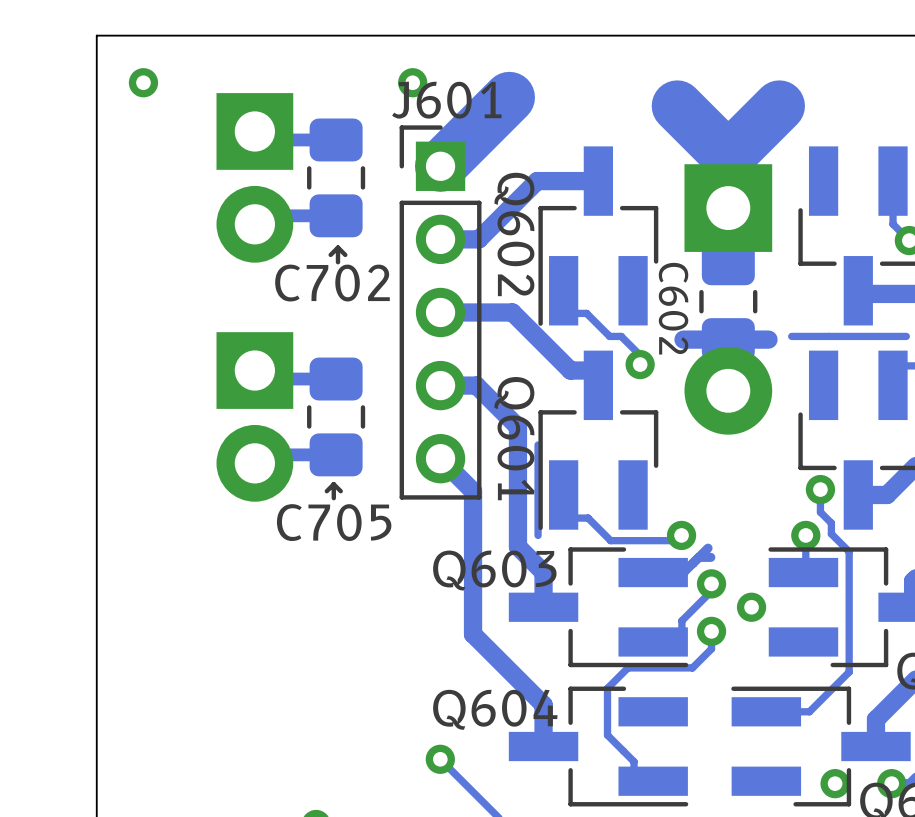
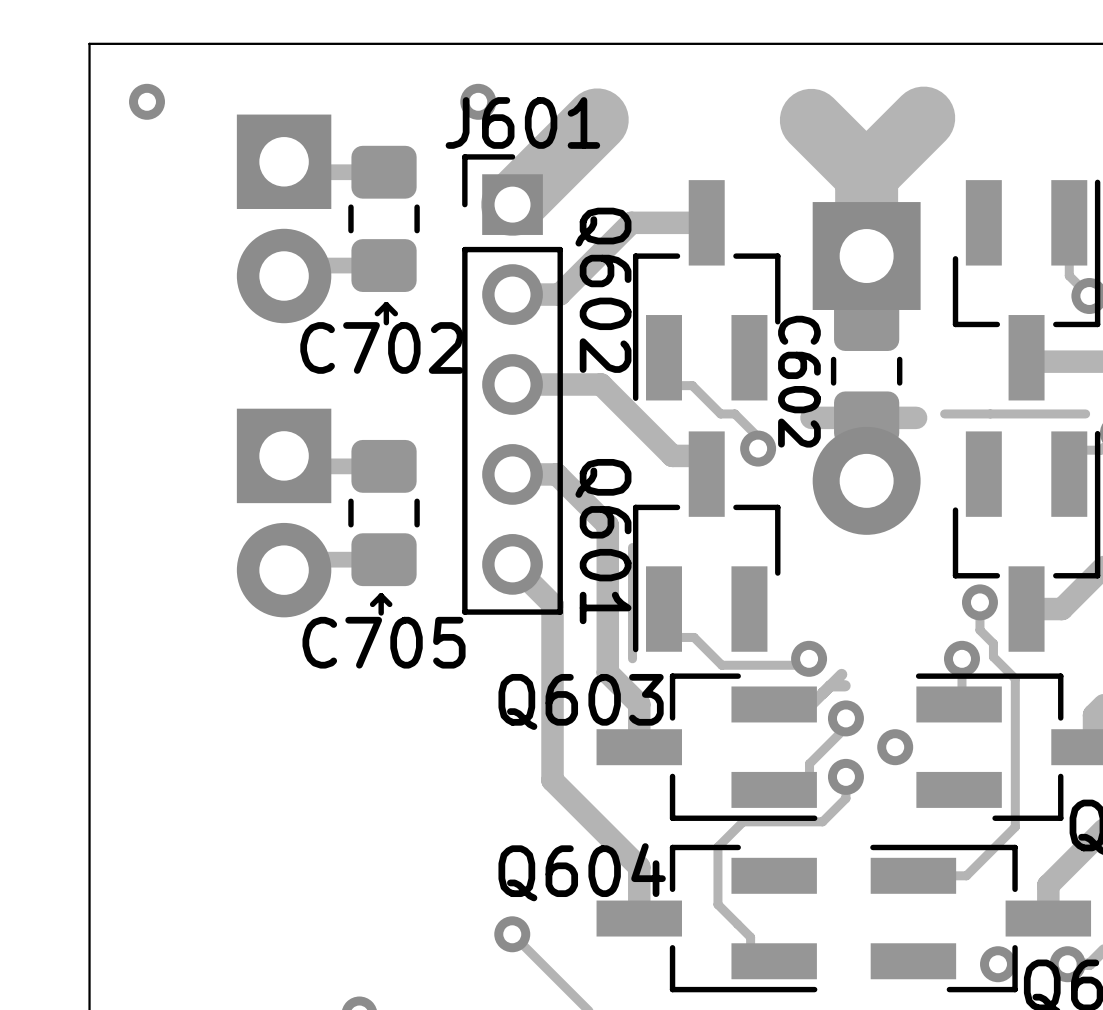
track: none -> (923, 118) (866, 175) (866, 193)
track: none -> (811, 120) (866, 175)
track: (779, 105) (728, 157) (677, 105) -> none

